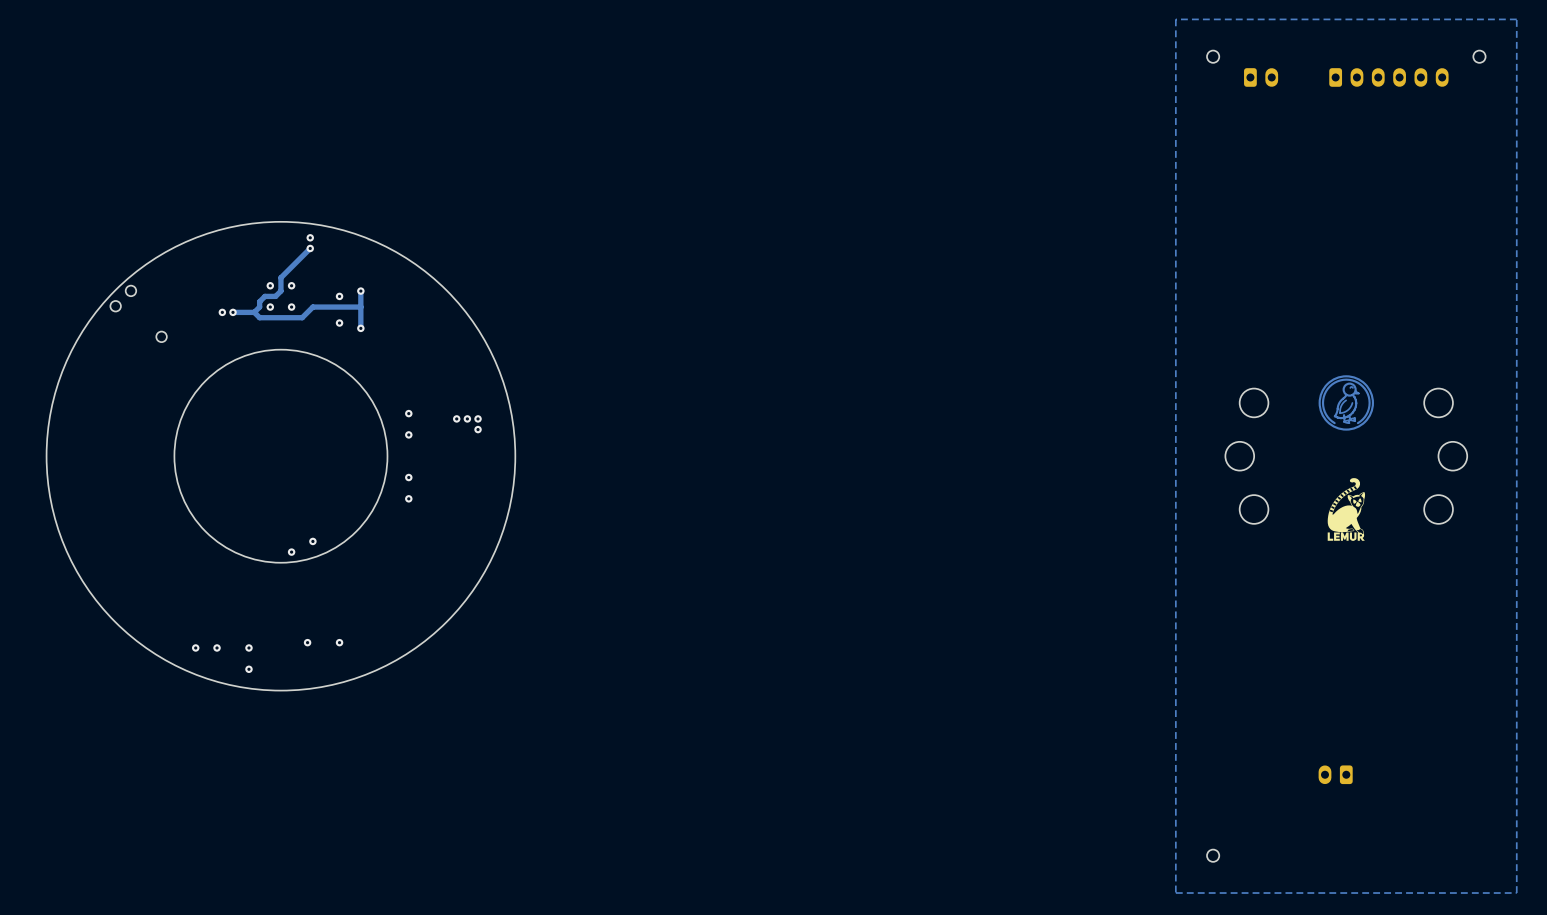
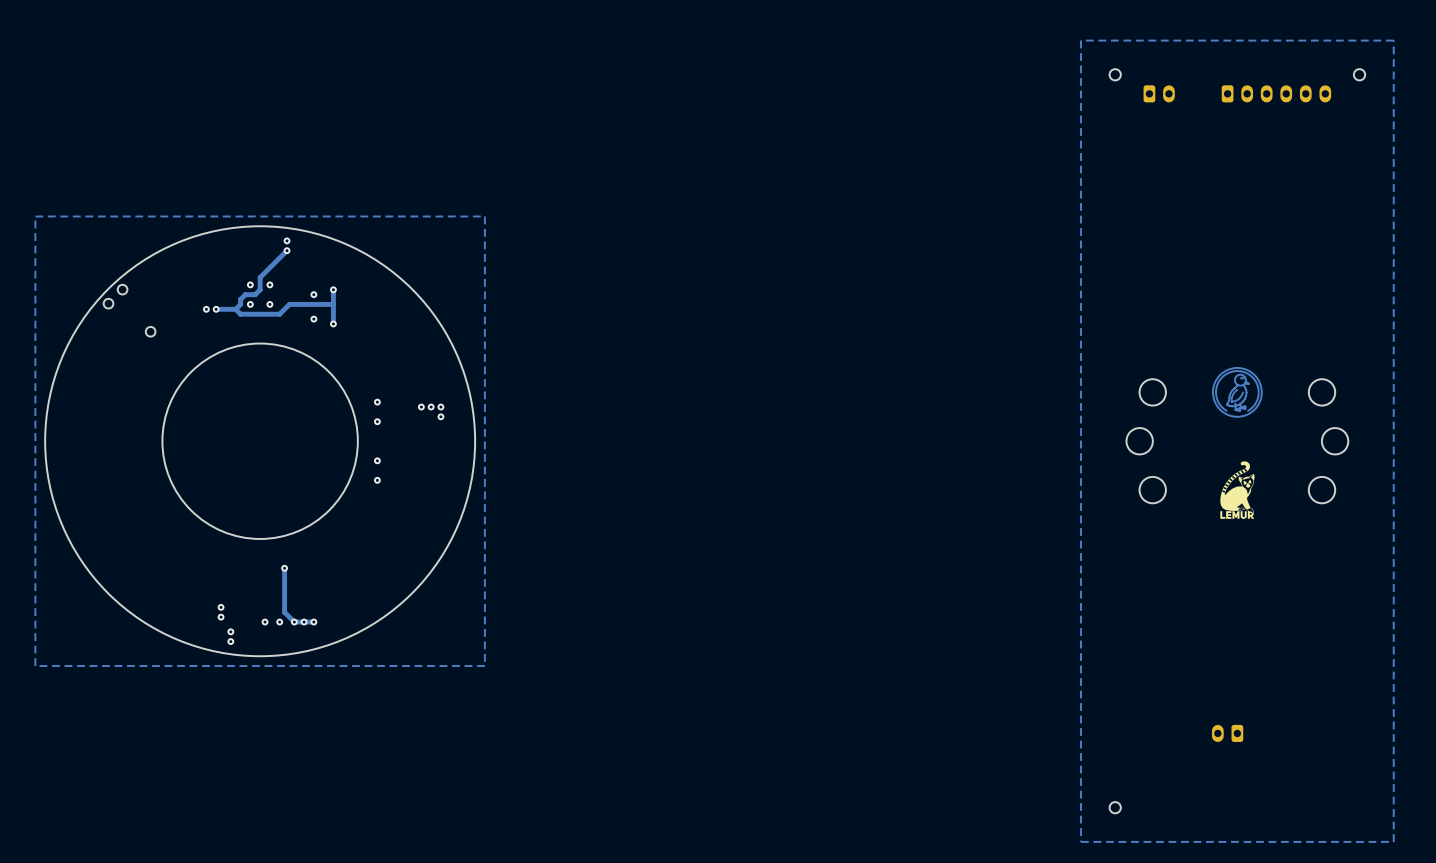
zone outline: none -> (484, 216) (35, 216) (35, 666) (484, 666) (484, 216)
via: (312, 541) -> none
via: (291, 552) -> none
track: none -> (284, 568) (284, 612) (294, 622) (313, 622)
via: none -> (284, 568)
via: none -> (221, 607)
via: (307, 642) -> none
via: (339, 642) -> none
via: (195, 647) -> none
via: (217, 647) -> none
via: none -> (221, 617)
via: (248, 647) -> none
via: none -> (265, 622)
via: none -> (279, 622)
via: none -> (294, 622)
via: none -> (304, 622)
via: none -> (313, 622)
via: none -> (230, 631)
via: (248, 669) -> none
via: none -> (230, 641)

